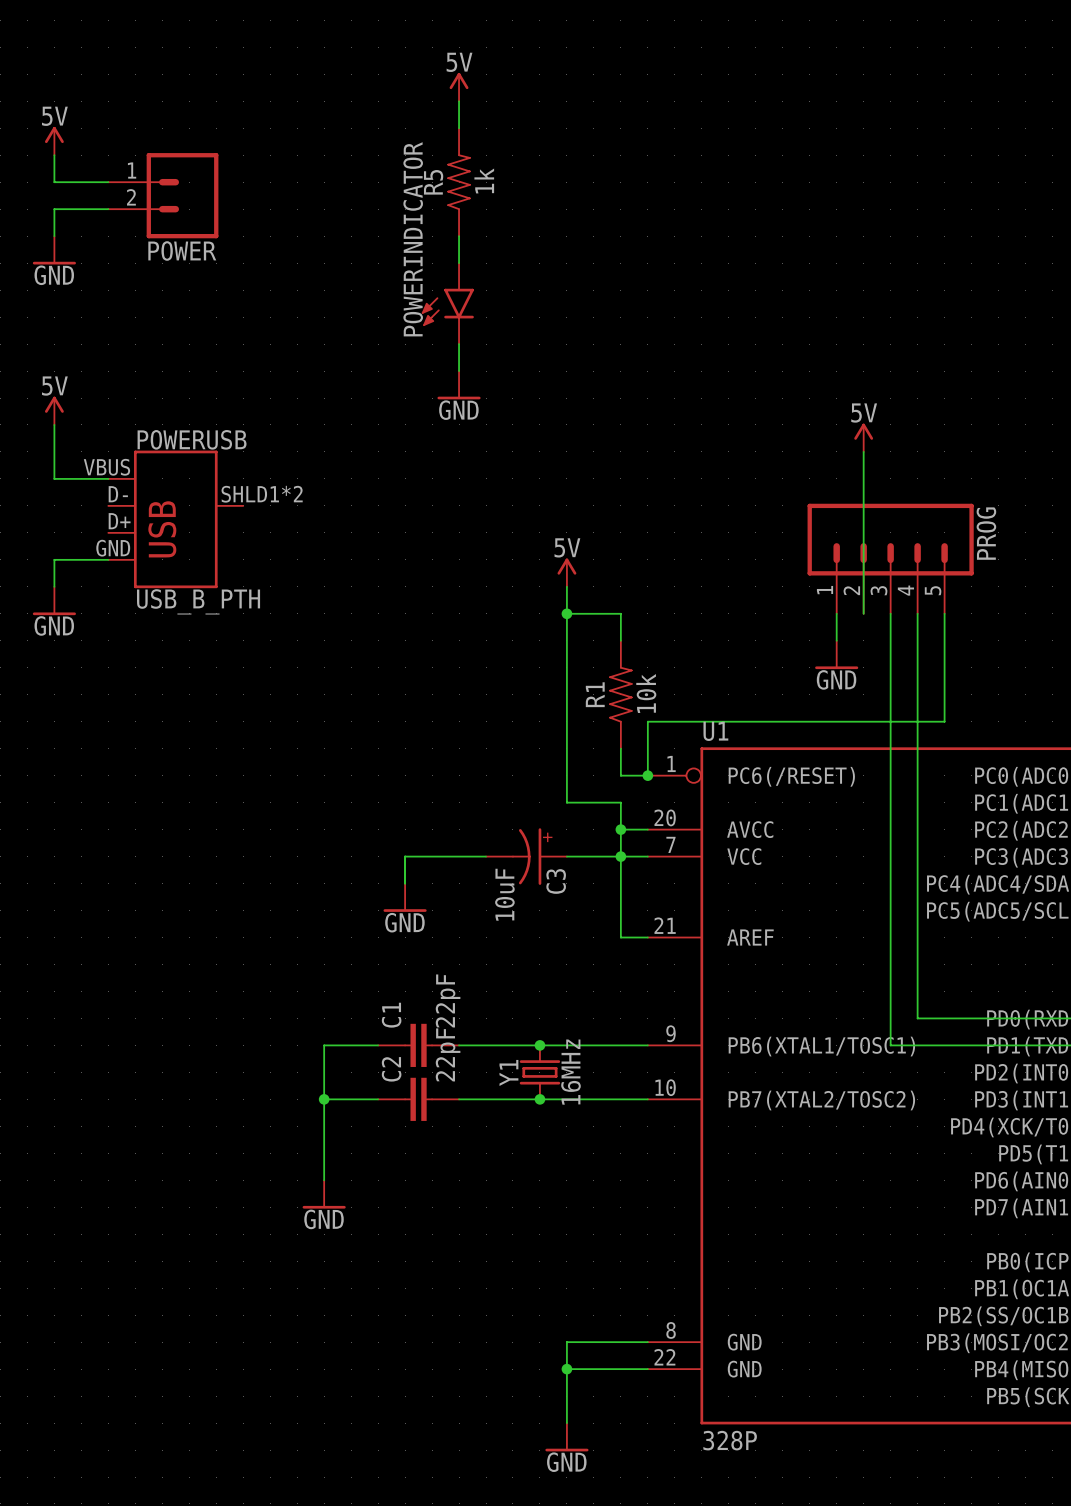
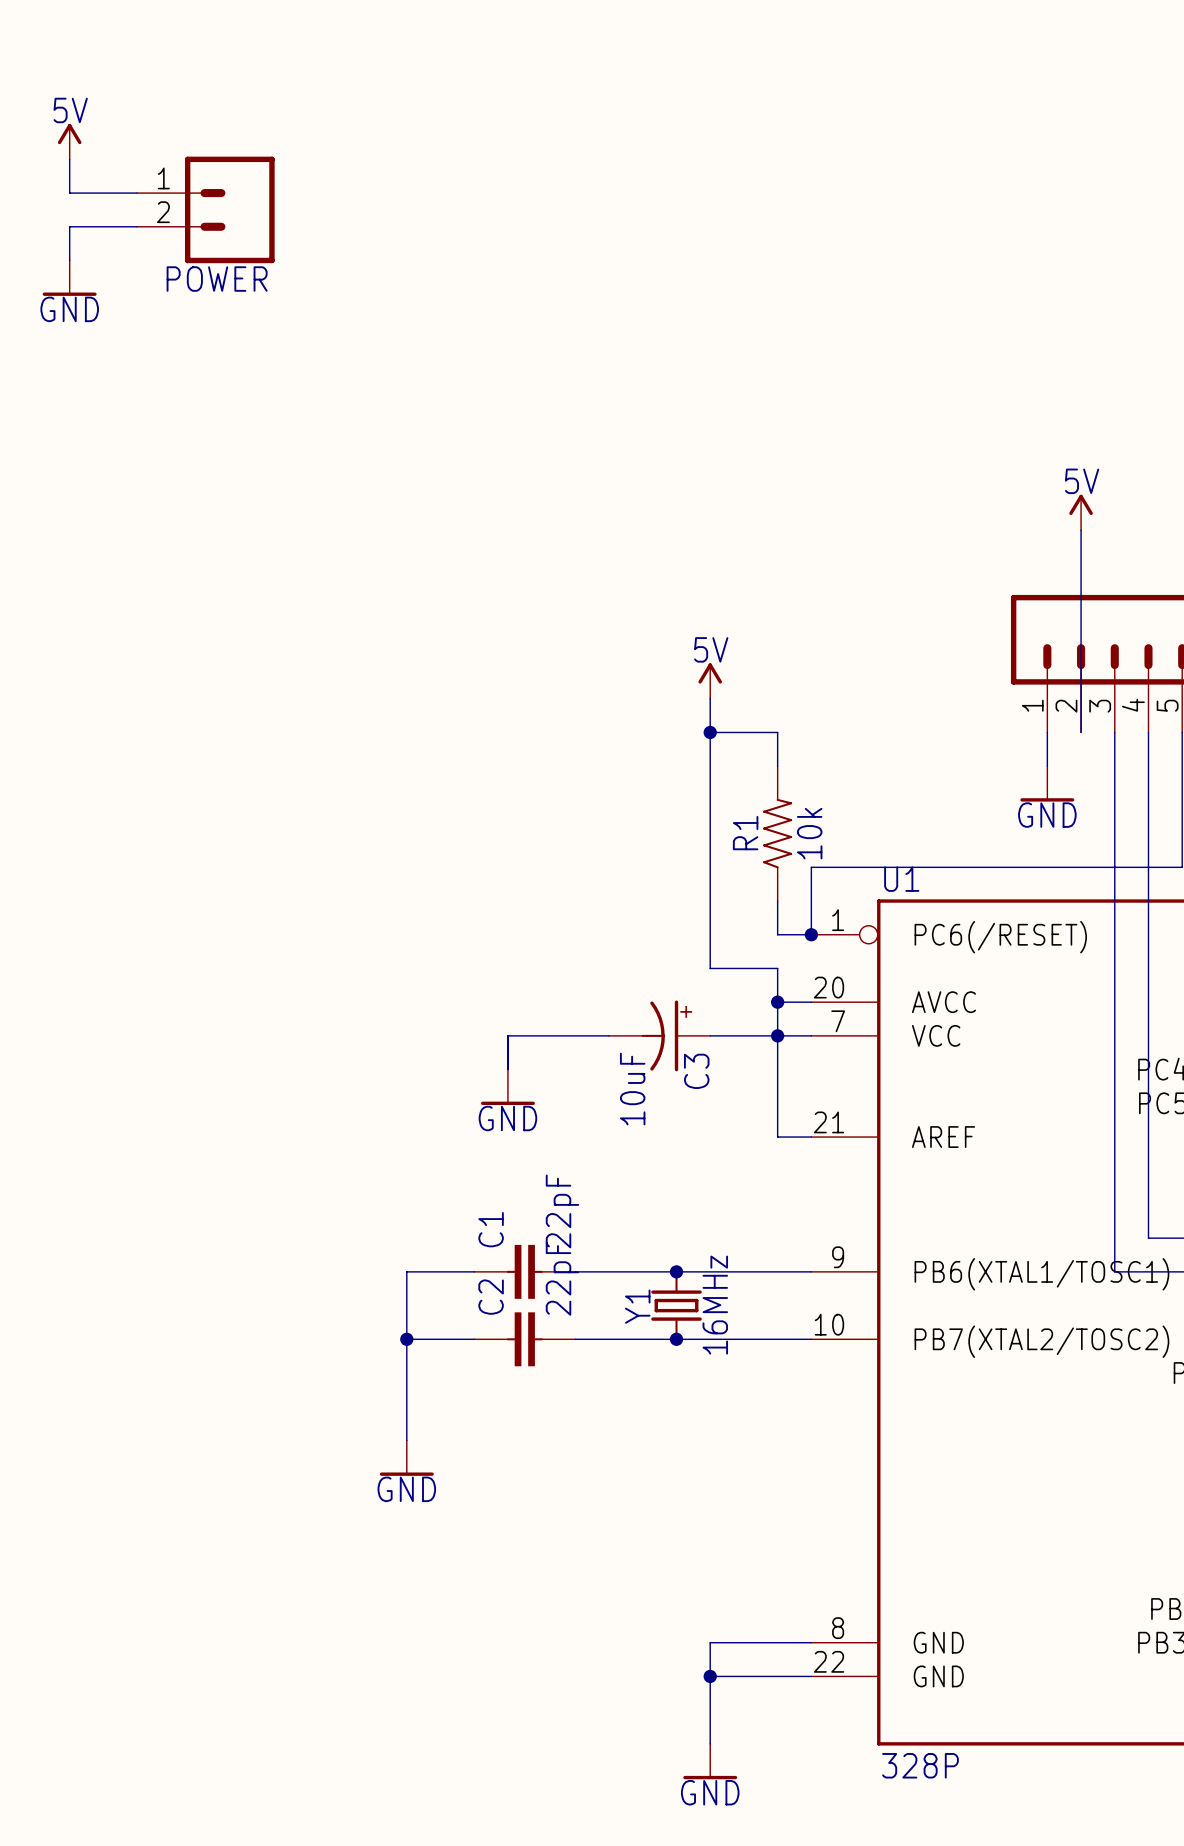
power symbol: 5V (459, 87) -> none
wire: (459, 101) (459, 128) -> none
R5: 1k (459, 182) -> none
wire: (459, 236) (459, 263) -> none
POWERINDICATOR: (447, 303) -> none
wire: (459, 344) (459, 371) -> none
power symbol: GND (459, 385) -> none
power symbol: 5V (54, 410) -> none
wire: (54, 424) (54, 478) (108, 478) -> none
POWERUSB: USB_B_PTH (175, 519) -> none
wire: (108, 559) (54, 559) (54, 586) -> none
power symbol: GND (54, 600) -> none

